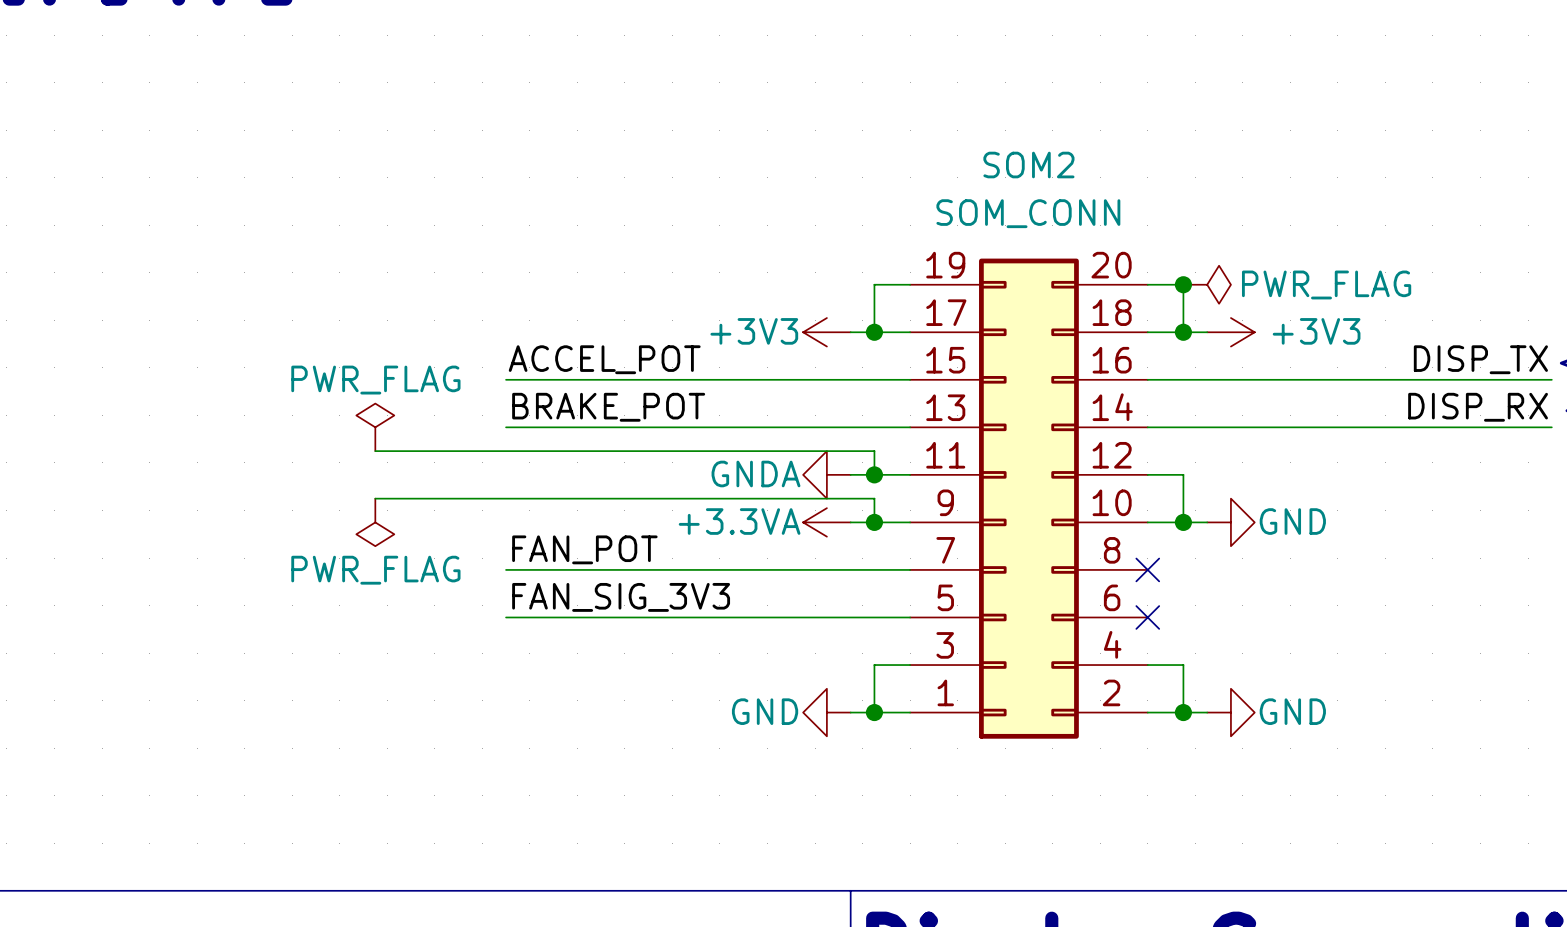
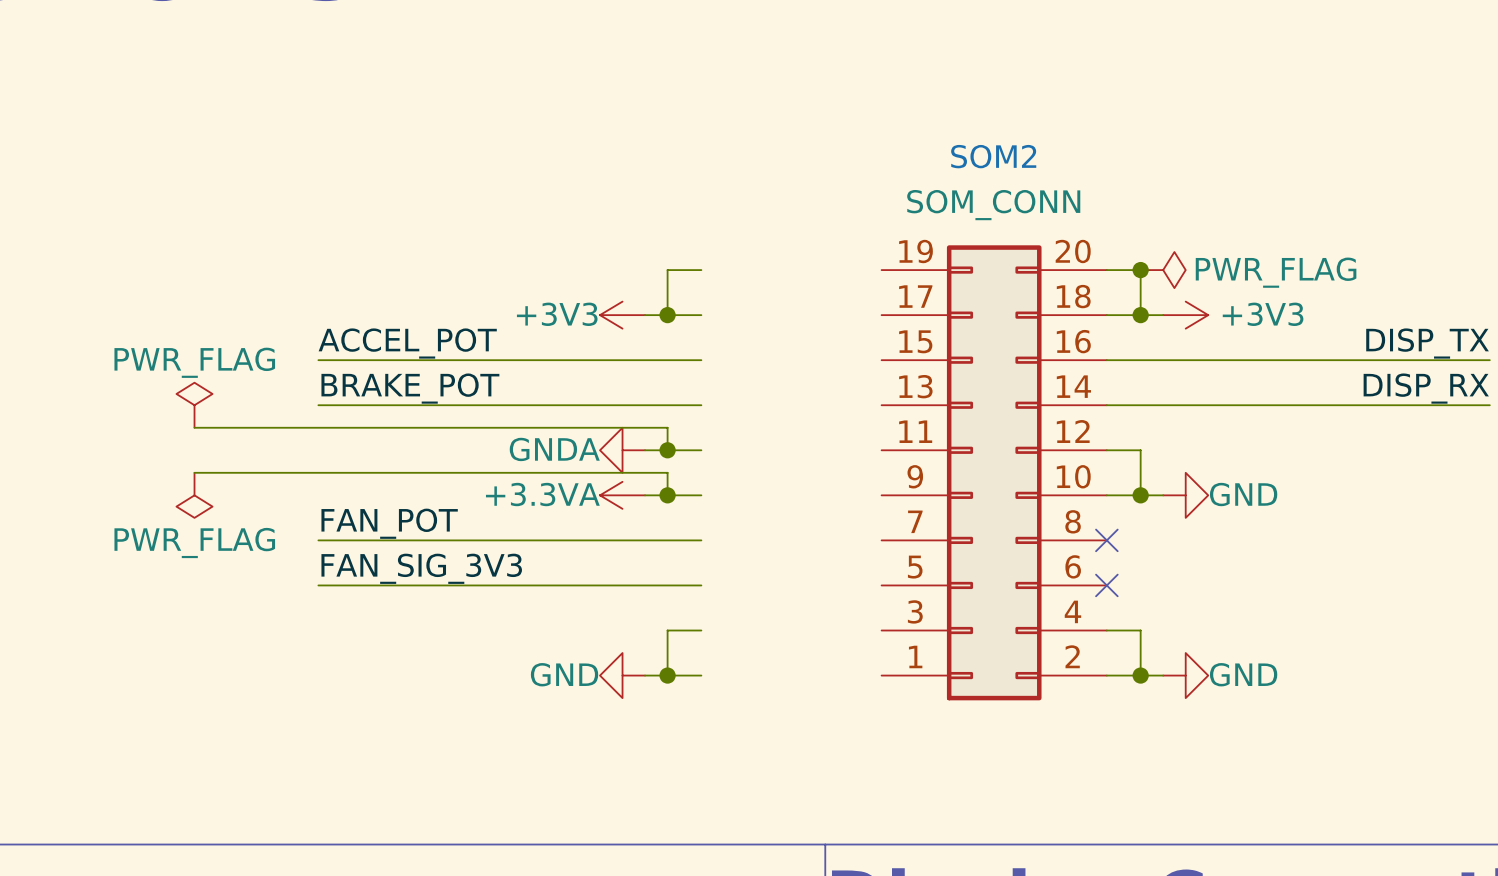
wire: (910, 284) (874, 284) (874, 332) -> (701, 270) (667, 270) (667, 315)
junction: none -> (667, 315)
power symbol position: +3V3 (826, 332) -> +3V3 (622, 315)
wire: (850, 332) (910, 332) -> (645, 315) (701, 315)
junction: (874, 332) -> none
label position: ACCEL_POT (604, 359) -> ACCEL_POT (407, 343)
wire: (719, 379) (910, 379) -> (318, 360) (498, 360)
label position: BRAKE_POT (608, 407) -> BRAKE_POT (410, 388)
power symbol: none -> PWR_FLAG (194, 405)
power symbol: PWR_FLAG (375, 427) -> none
wire: (719, 427) (910, 427) -> (318, 405) (498, 405)
wire: none -> (194, 427) (374, 427)
wire: (684, 451) (874, 451) (874, 474) -> (667, 427) (667, 450)
junction: none -> (667, 450)
power symbol position: GNDA (826, 474) -> GNDA (622, 450)
wire: (850, 474) (910, 474) -> (645, 450) (701, 450)
junction: (874, 474) -> none
wire: none -> (194, 472) (374, 472)
wire: (684, 498) (874, 498) (874, 522) -> (667, 472) (667, 495)
power symbol: none -> PWR_FLAG (194, 495)
power symbol: PWR_FLAG (375, 522) -> none
junction: none -> (667, 495)
power symbol position: +3.3VA (826, 522) -> +3.3VA (622, 495)
wire: (850, 522) (910, 522) -> (645, 495) (701, 495)
junction: (874, 522) -> none
label position: FAN_POT (584, 549) -> FAN_POT (389, 523)
wire: (719, 569) (910, 569) -> (318, 540) (498, 540)
label position: FAN_SIG_3V3 (621, 597) -> FAN_SIG_3V3 (421, 568)
wire: (719, 617) (910, 617) -> (318, 585) (498, 585)
wire: (910, 665) (874, 665) (874, 712) -> (701, 630) (667, 630) (667, 675)
junction: none -> (667, 675)
power symbol position: GND (826, 712) -> GND (622, 675)
wire: (850, 712) (910, 712) -> (645, 675) (701, 675)
junction: (874, 712) -> none

